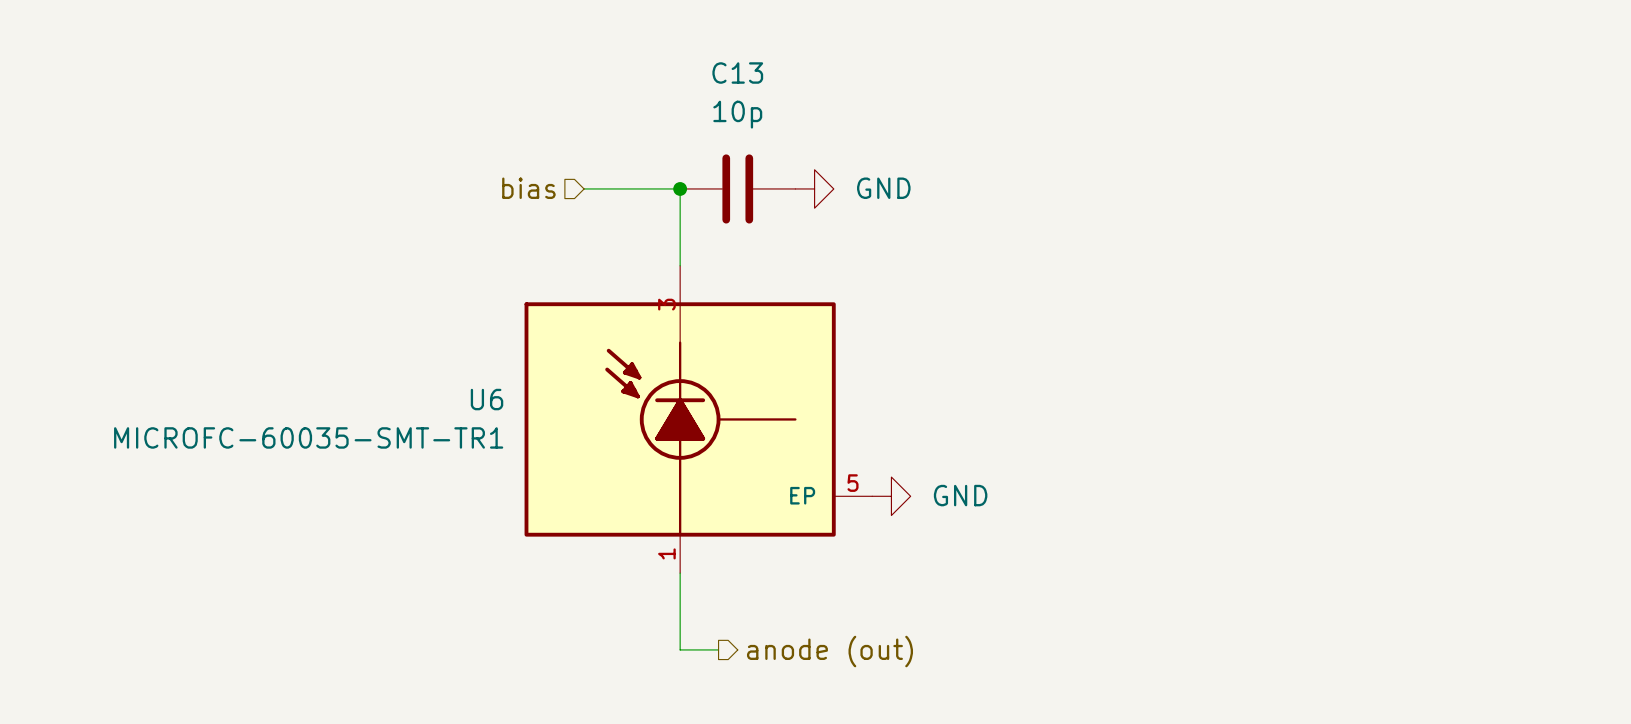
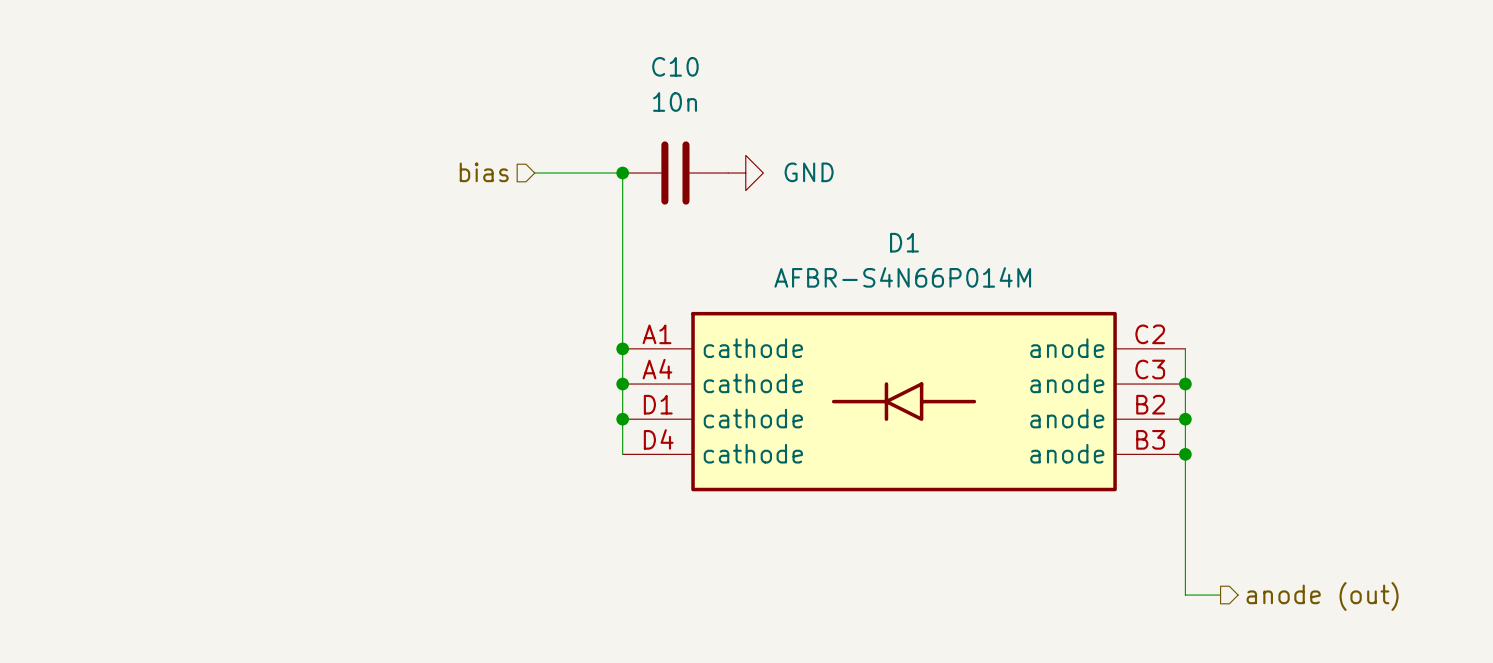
C13 name: C13 (737, 73) -> C10 (675, 66)
C13 value: 10p (737, 114) -> 10n (675, 102)
junction: none -> (622, 348)
wire: none -> (1185, 348) (1185, 595) (1220, 595)
junction: none -> (622, 384)
U6: MICROFC-60035-SMT-TR1 (698, 419) -> none
junction: none -> (1185, 384)
D1: none -> AFBR-S4N66P014M (904, 401)
junction: none -> (622, 419)
junction: none -> (1185, 419)
power symbol: GND (891, 496) -> none
junction: none -> (1185, 454)
wire: (680, 573) (680, 649) (718, 649) -> none
hierarchical label: anode (out) (829, 651) -> none
hierarchical label: none -> anode (out) (1322, 596)

